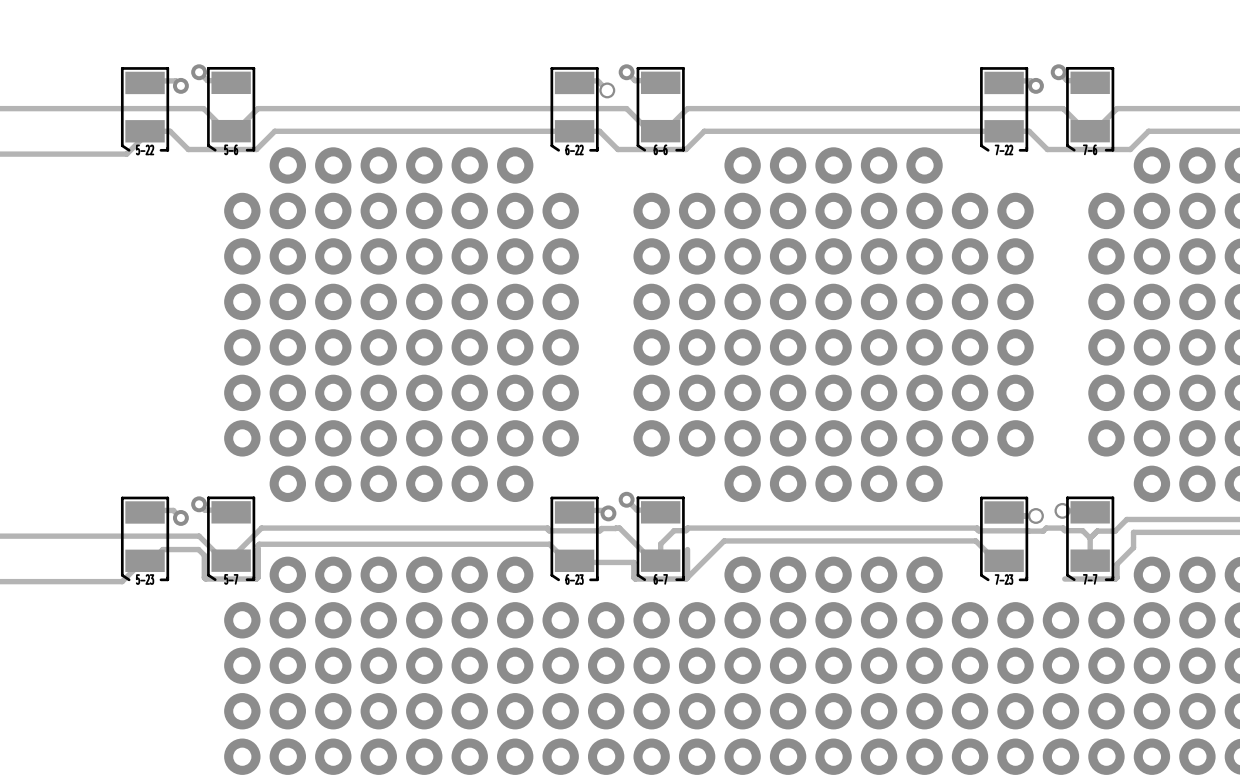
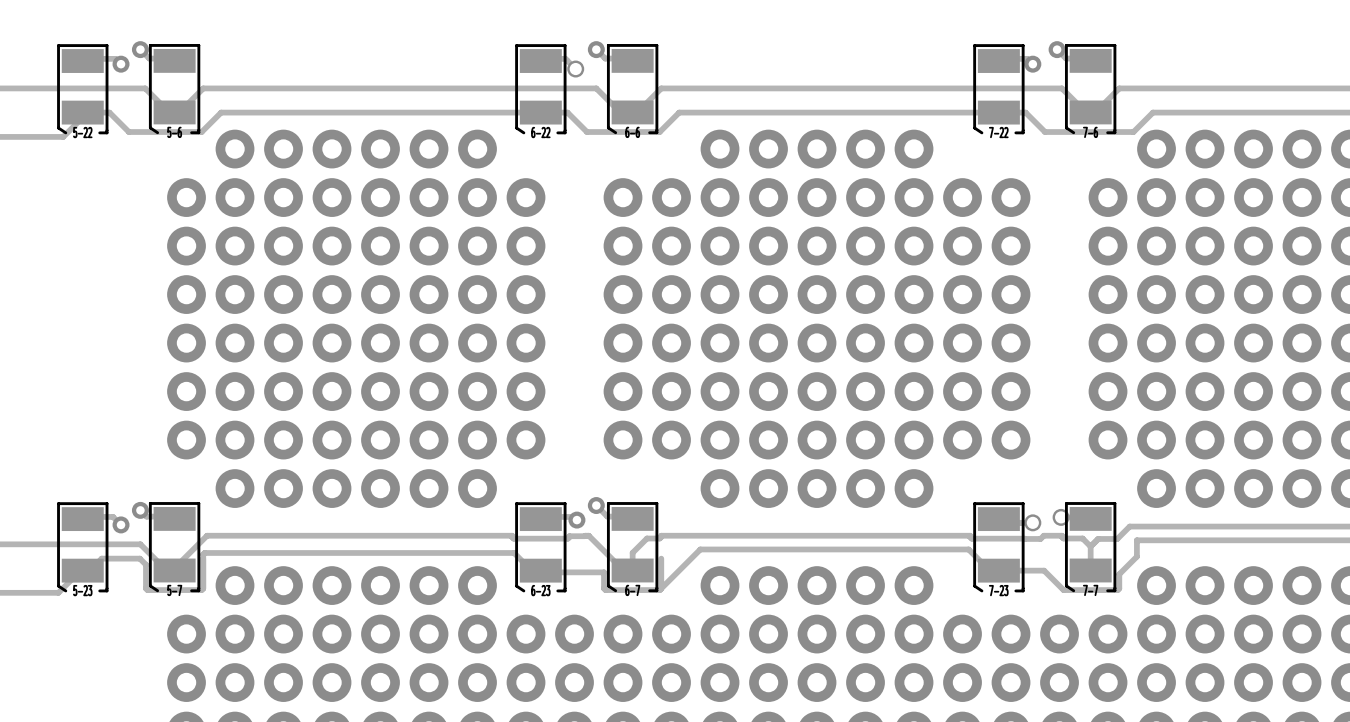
track: none -> (998, 570) (1044, 570) (1063, 590)

